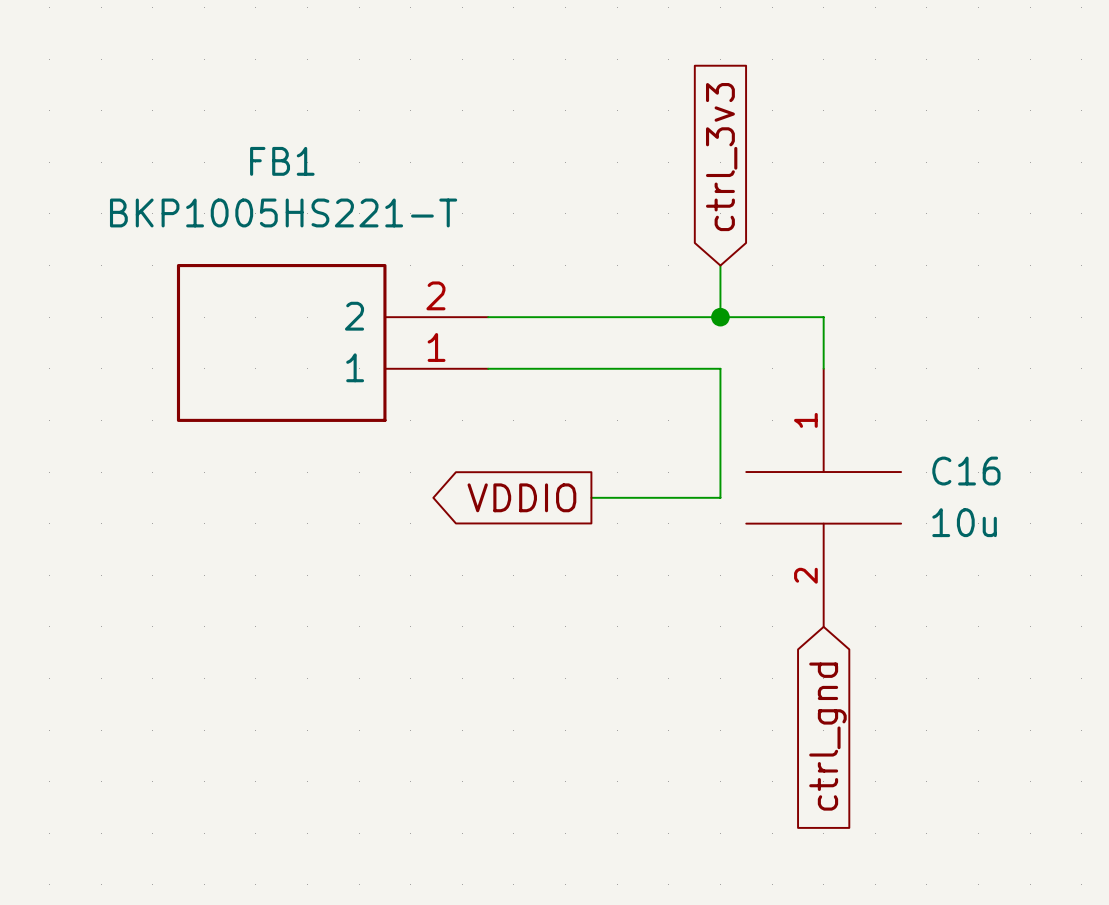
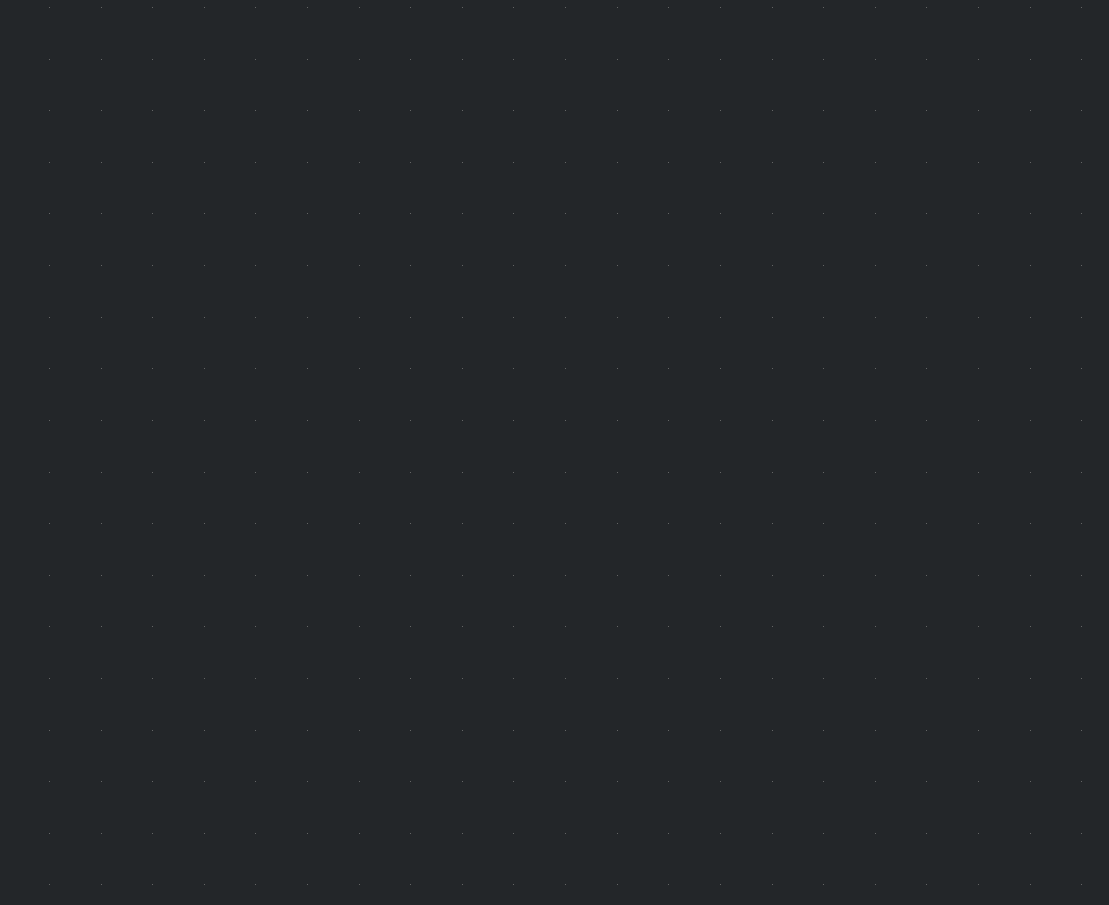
global label: ctrl_3v3 (721, 157) -> none
wire: (720, 265) (720, 317) -> none
wire: (488, 317) (823, 317) (823, 368) -> none
junction: (720, 317) -> none
FB1: BKP1005HS221-T (332, 342) -> none
wire: (488, 368) (720, 368) (720, 497) (591, 497) -> none
global label: VDDIO (521, 497) -> none
C16: 10u (823, 497) -> none
global label: ctrl_gnd (827, 736) -> none

